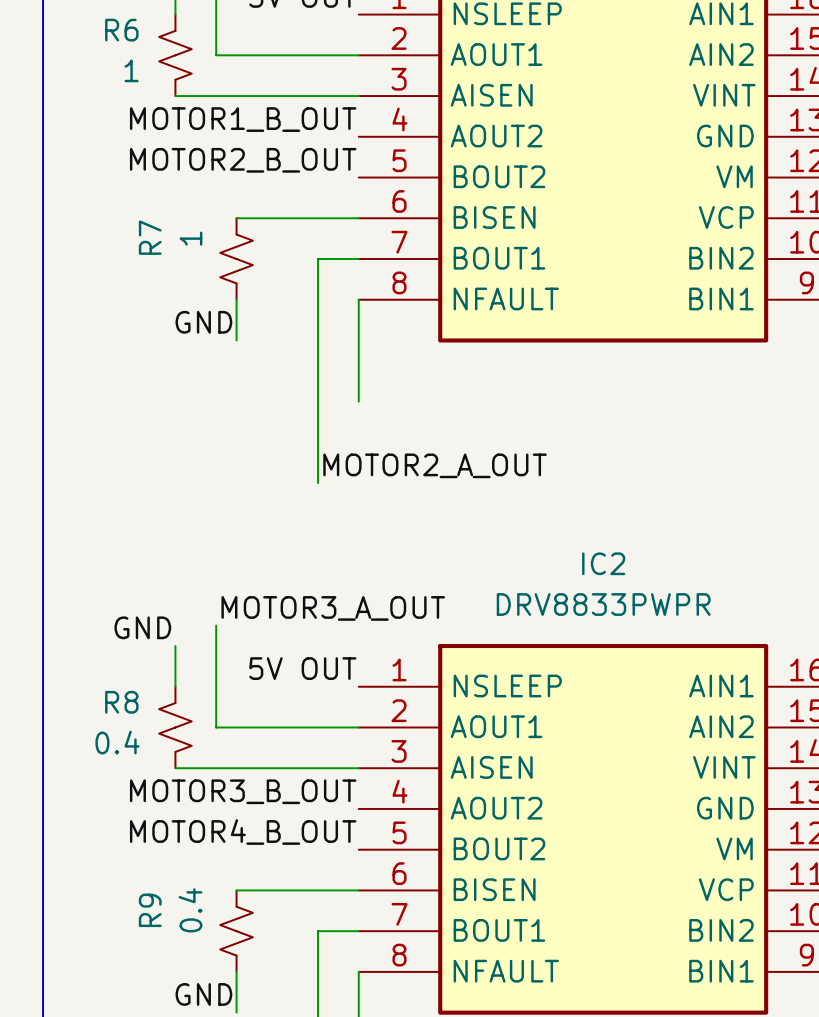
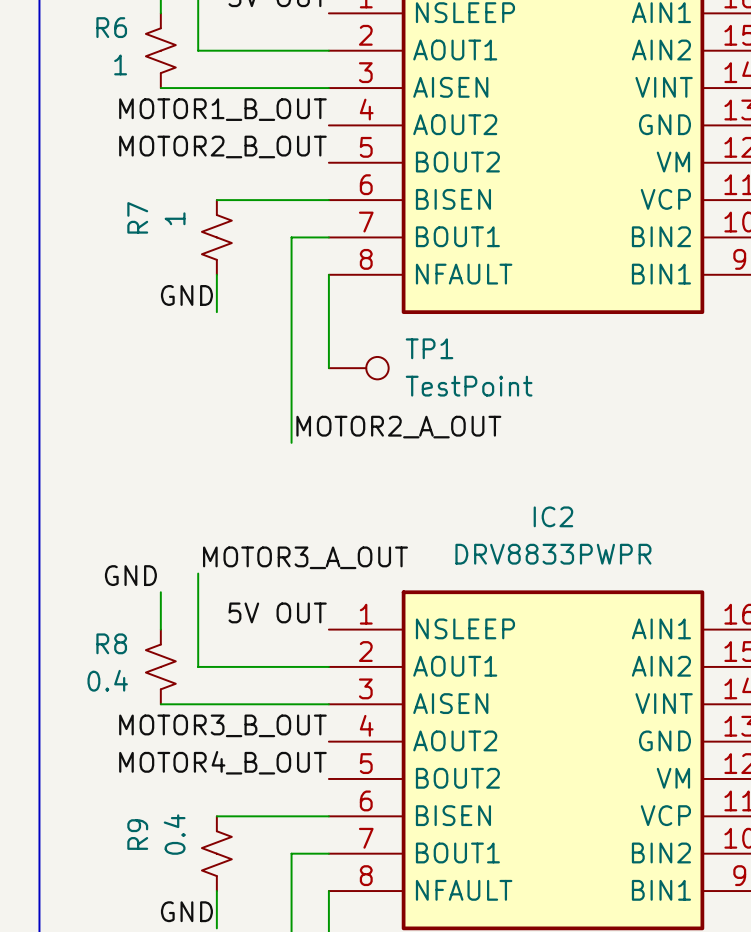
TP1: none -> TestPoint (358, 368)

